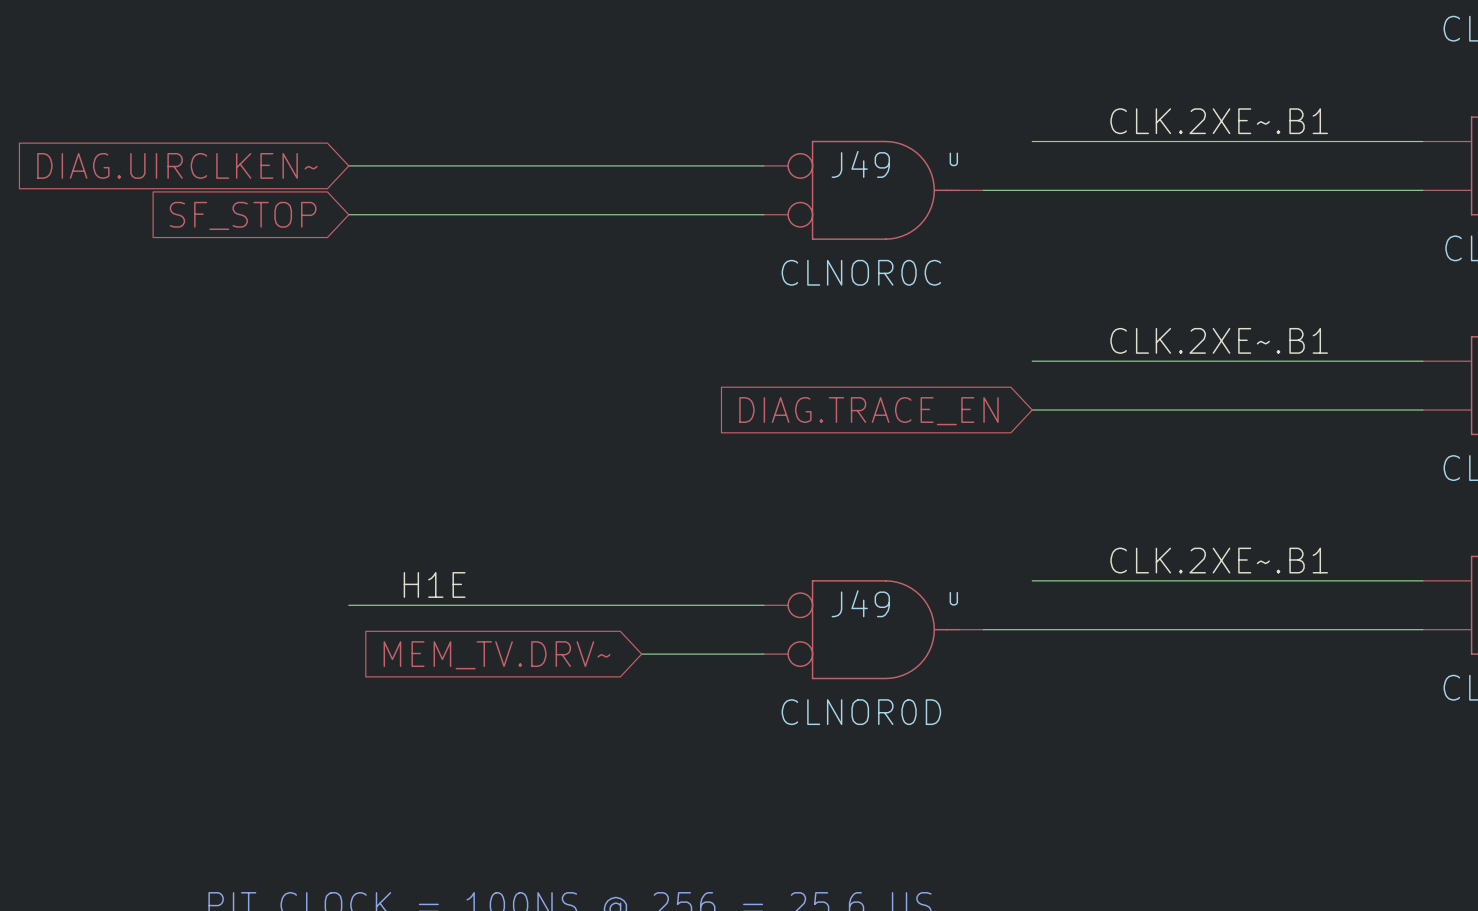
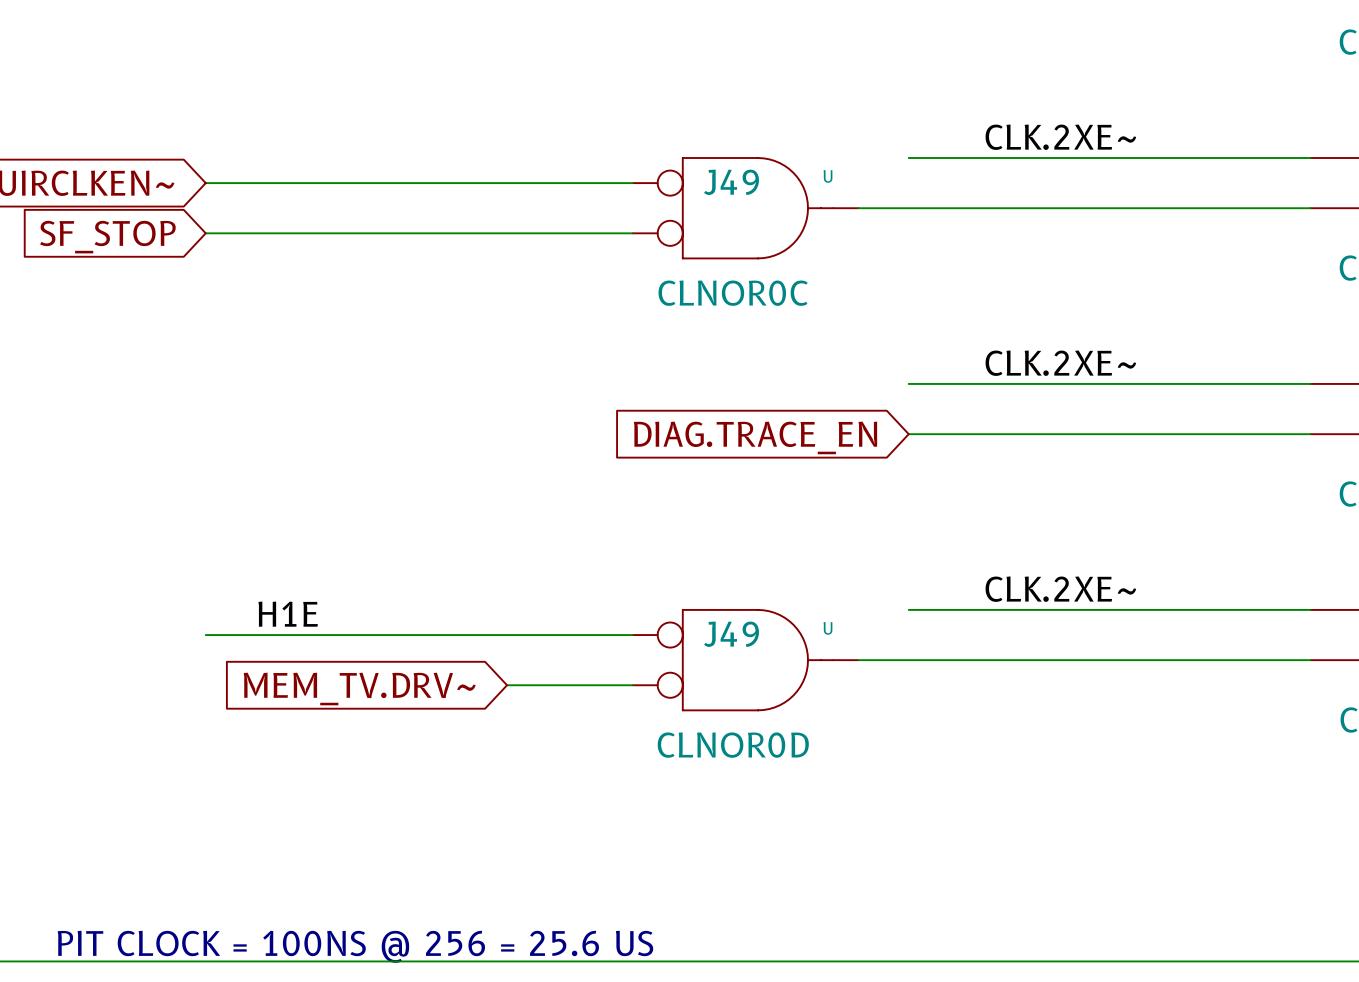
label: CLK.2XE~.B1 (1219, 121) -> CLK.2XE~ (1060, 137)
label: CLK.2XE~.B1 (1219, 340) -> CLK.2XE~ (1060, 363)
label: CLK.2XE~.B1 (1219, 560) -> CLK.2XE~ (1060, 589)

